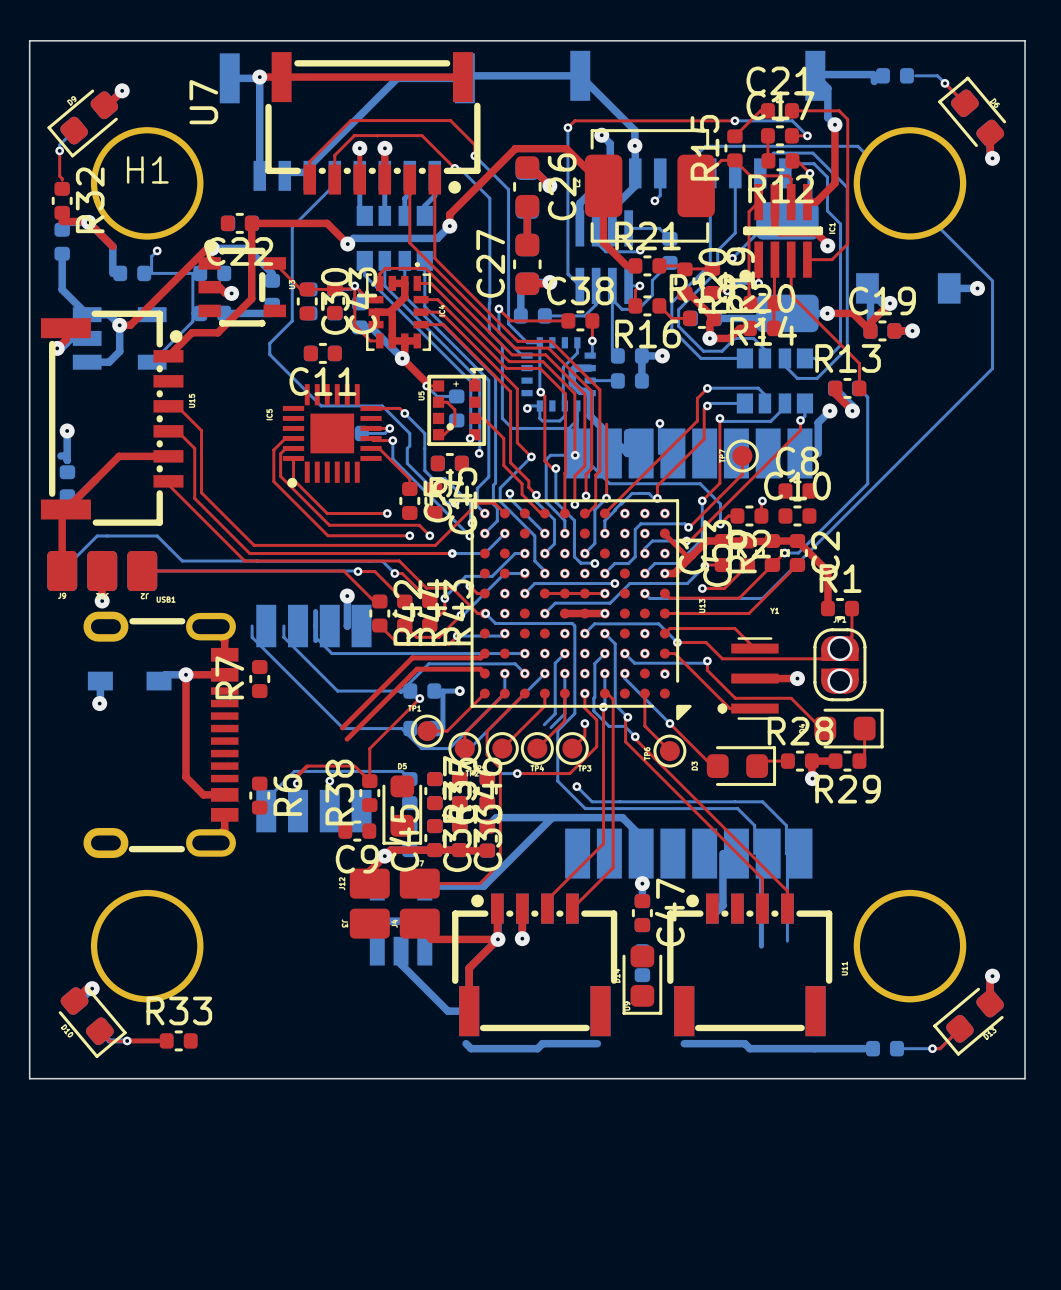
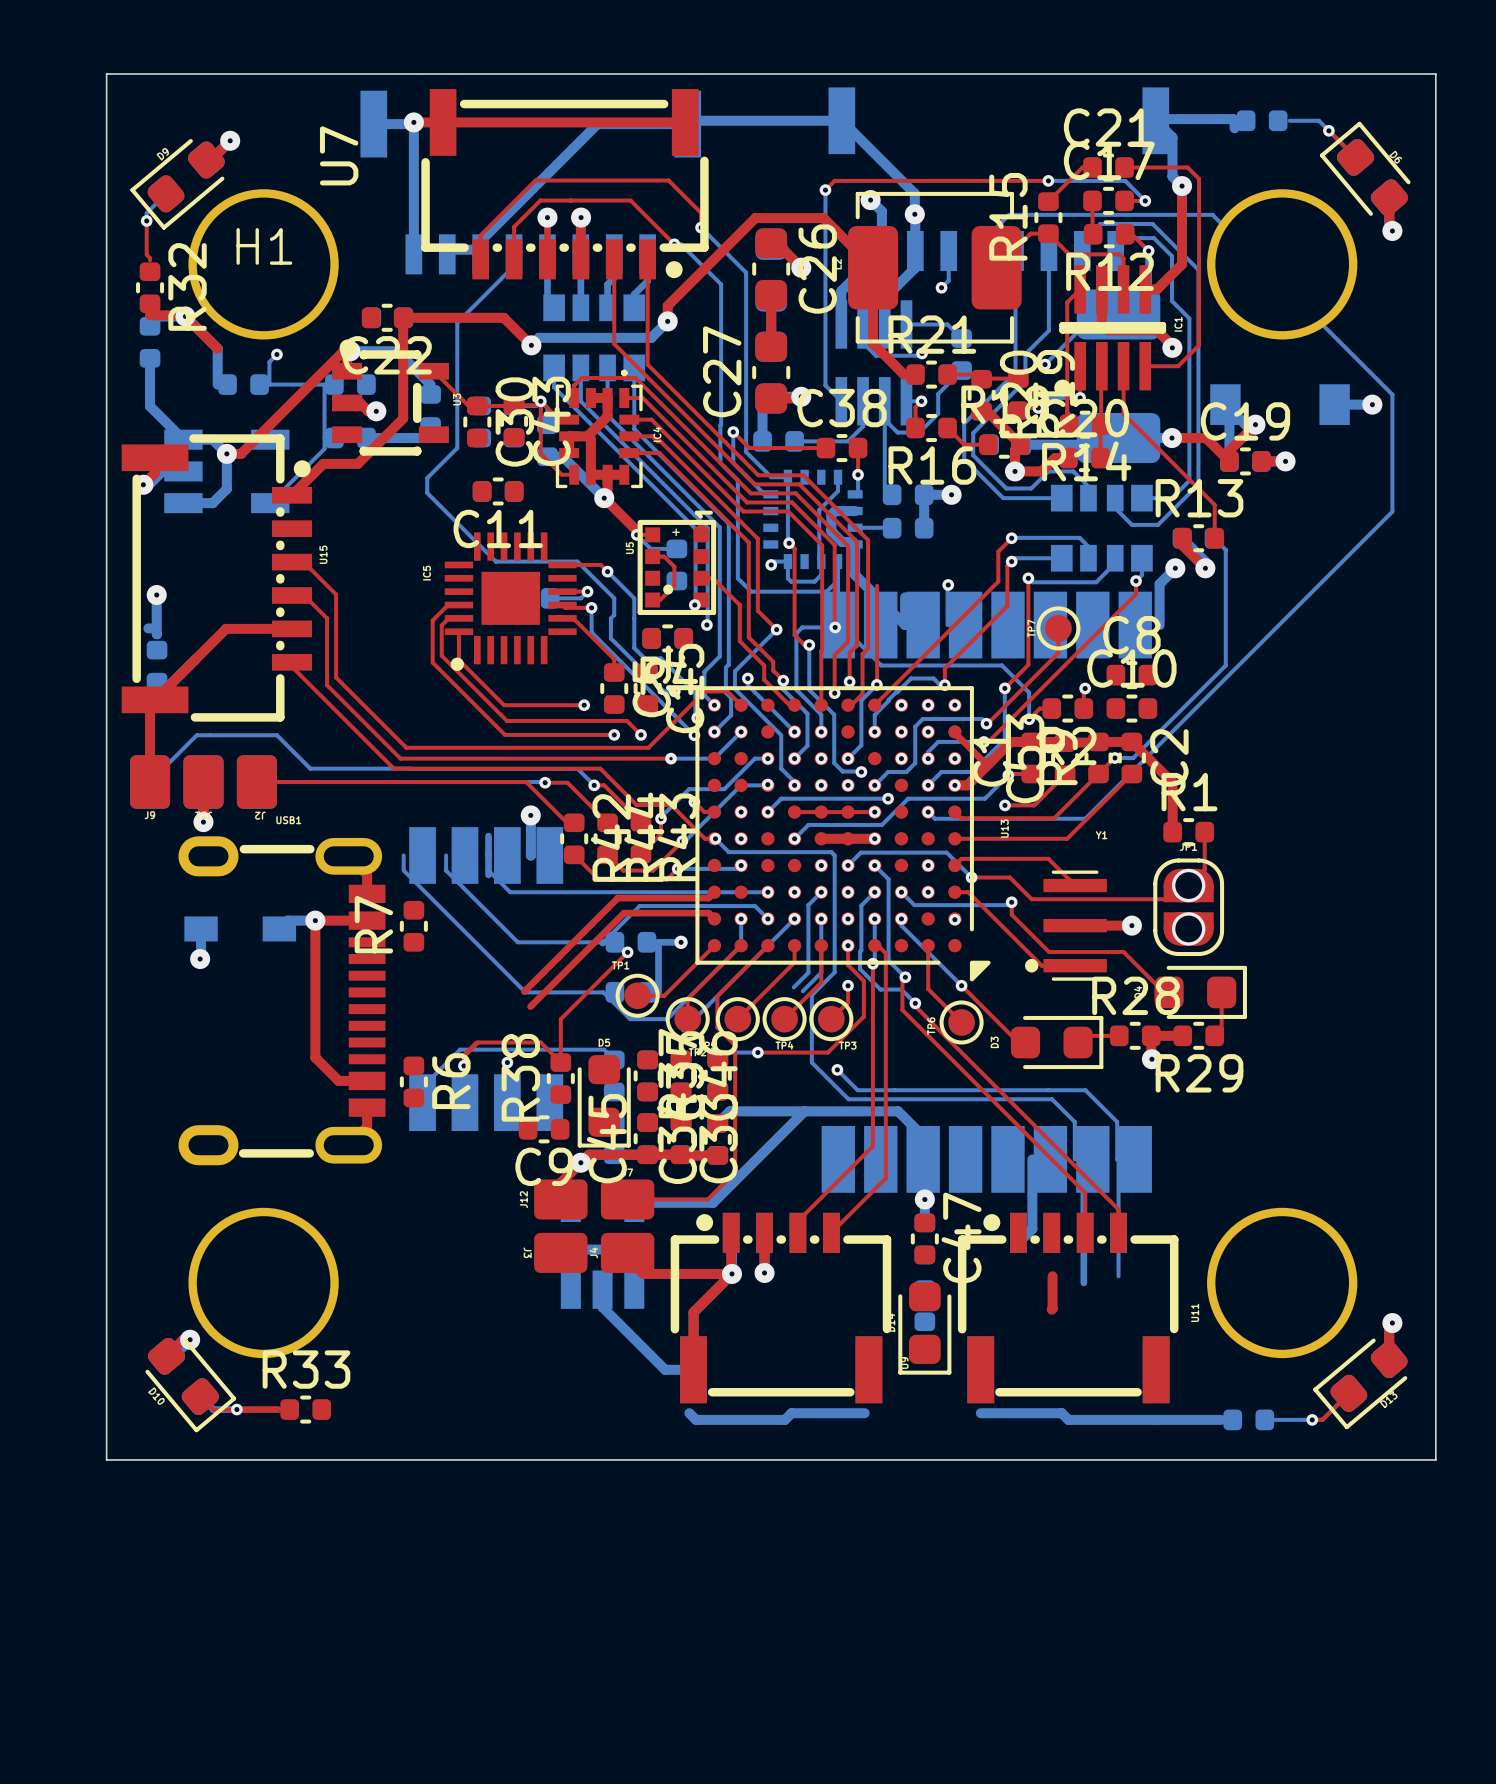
top track: none -> (1052, 1276) (1051, 1309)

